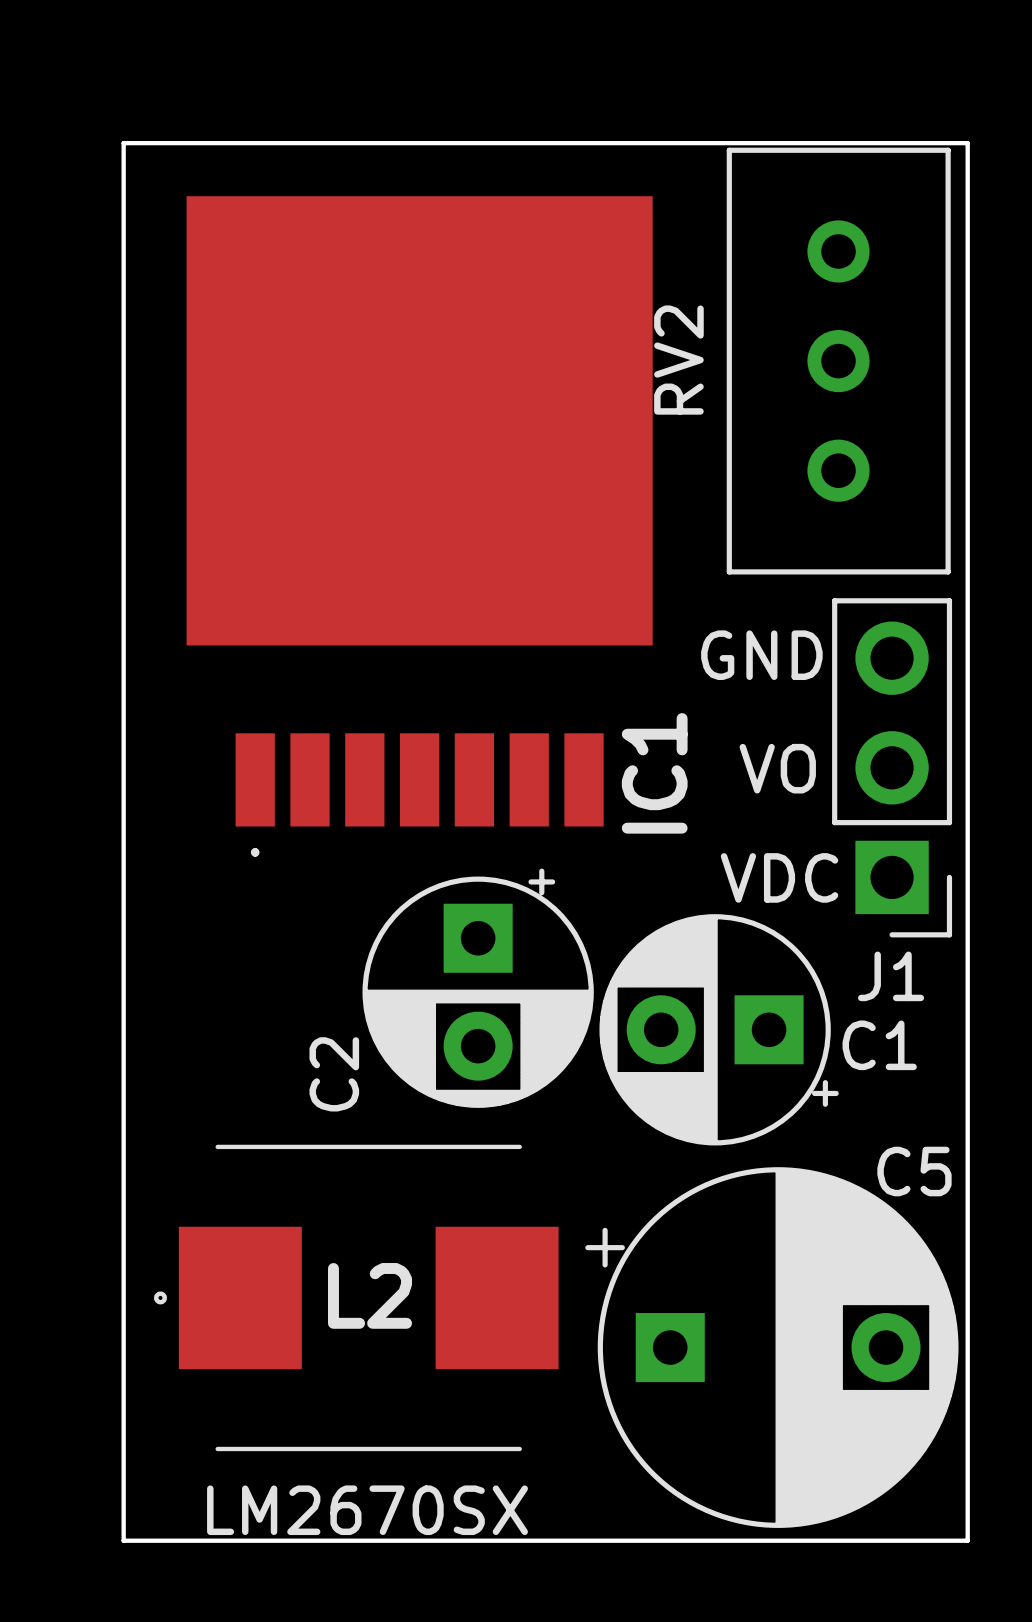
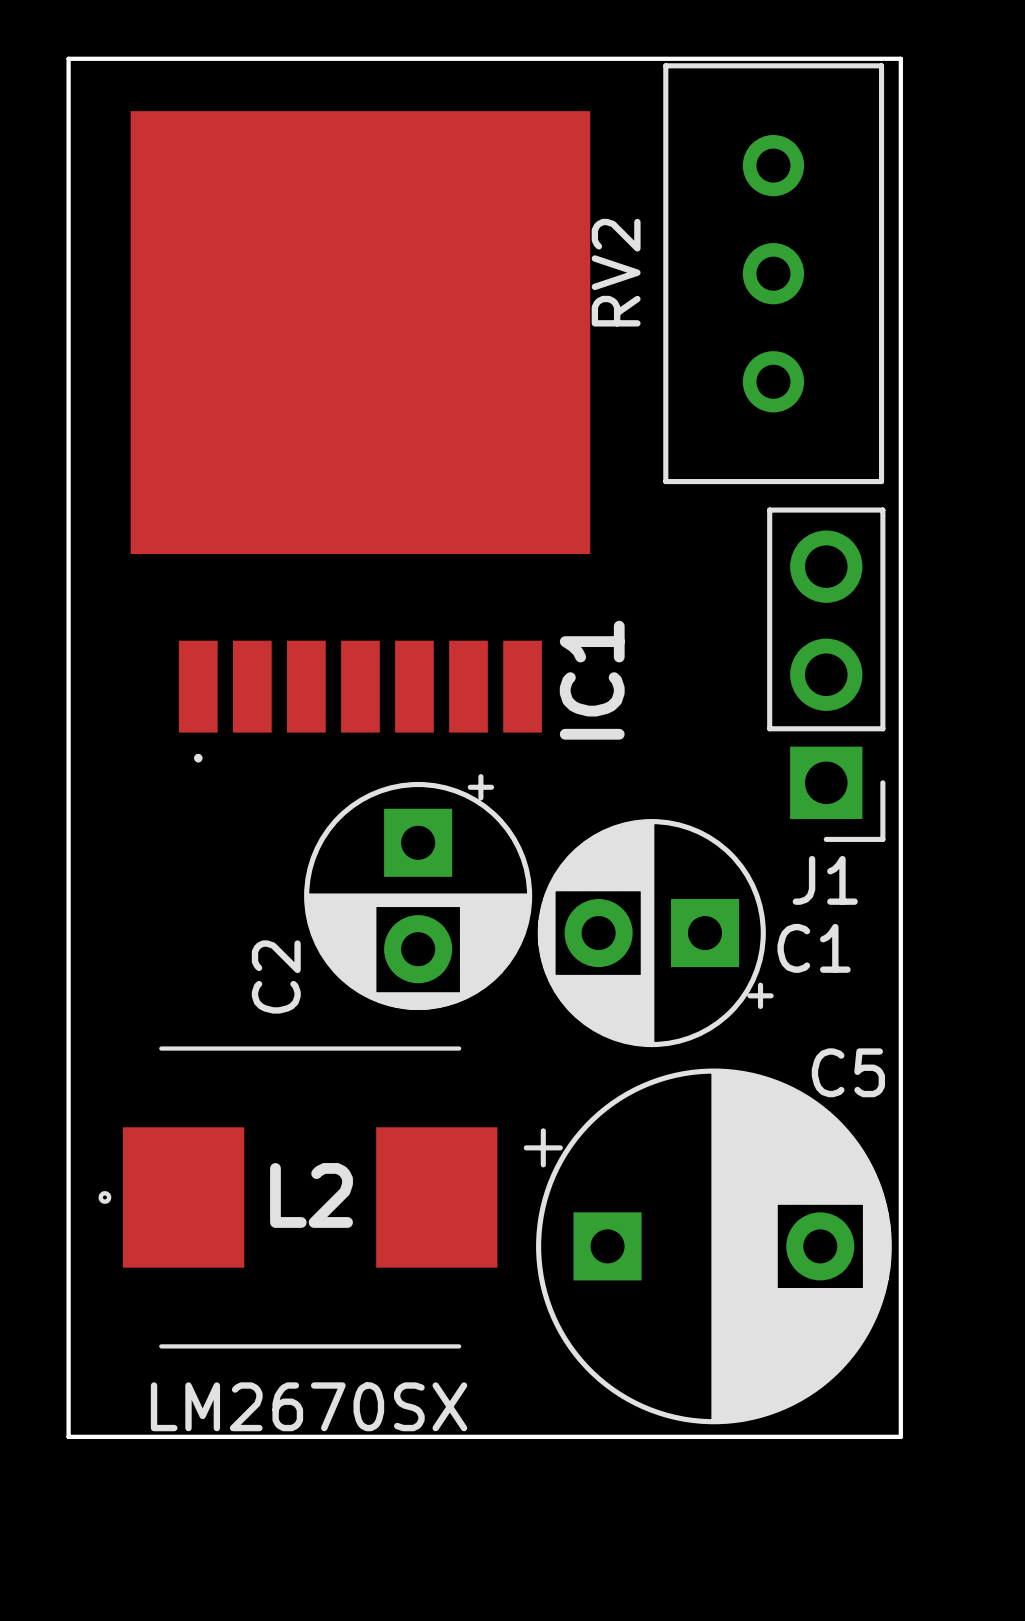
text: GND (761, 655) -> none
text: VO (777, 768) -> none
text: VDC (779, 877) -> none

